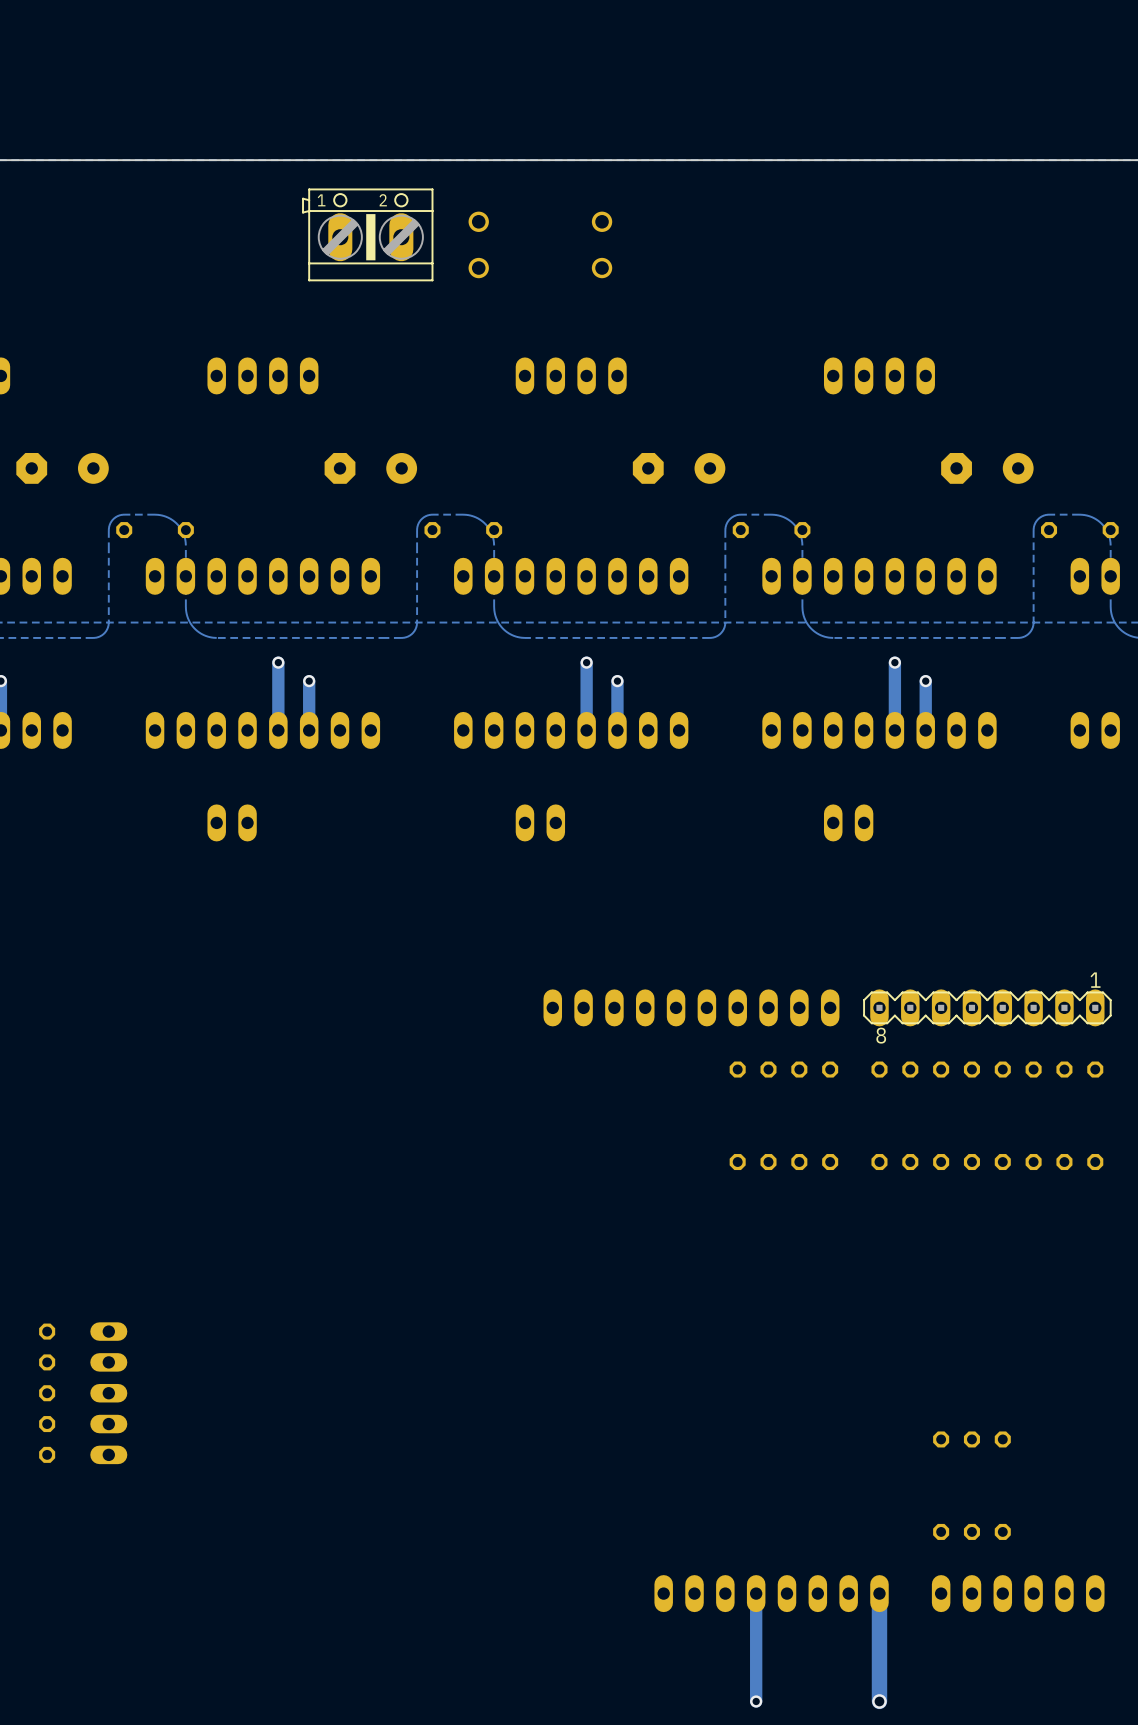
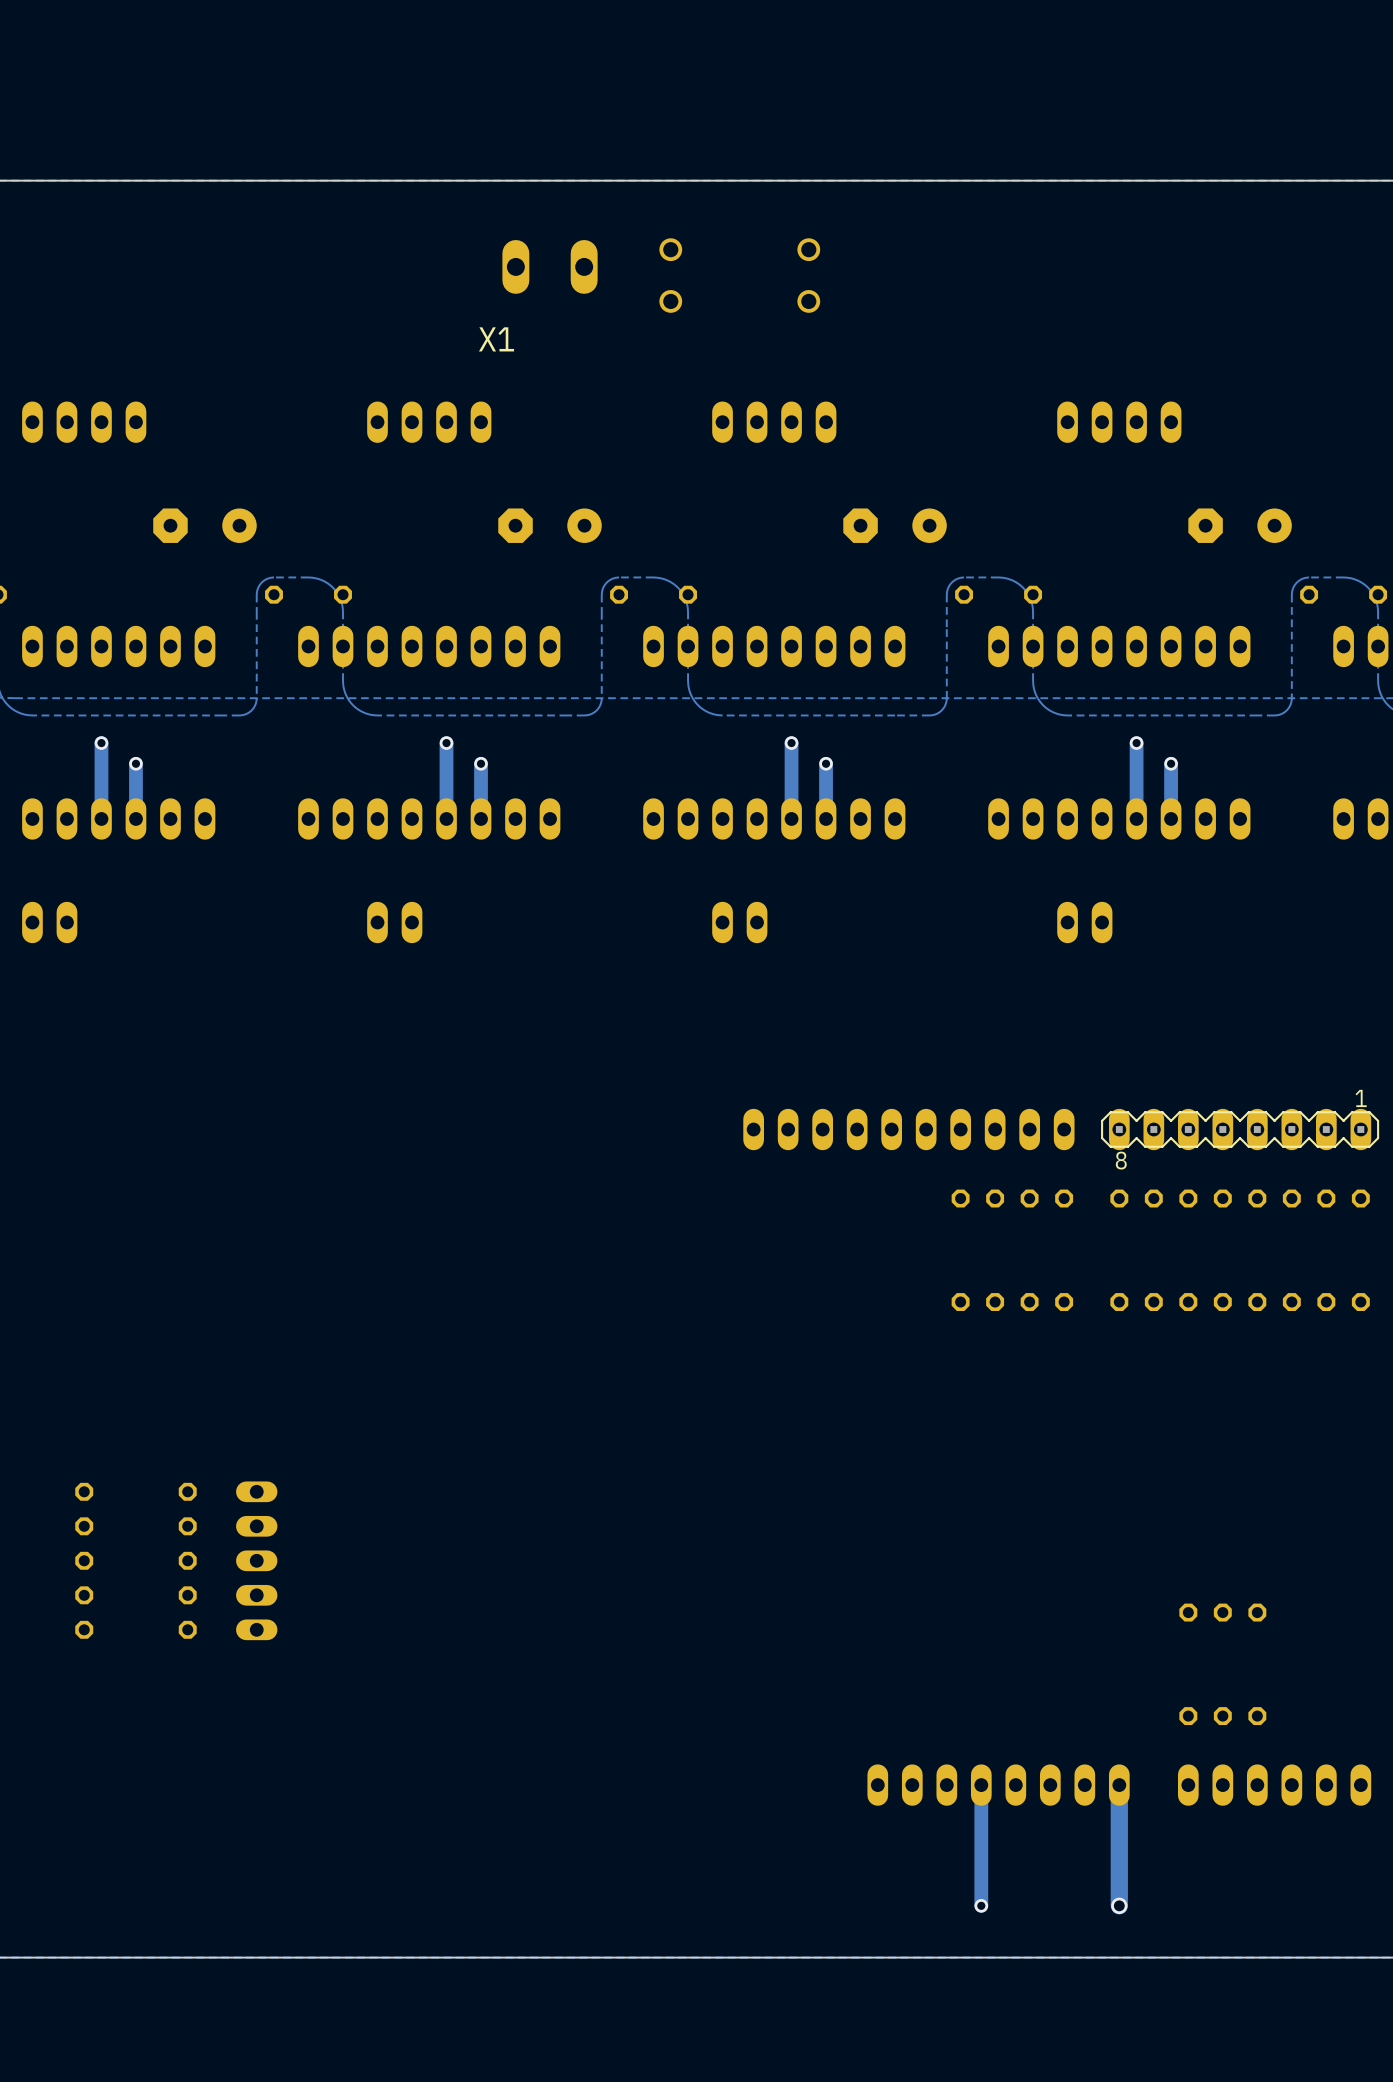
X1 side: bottom (367, 234) -> top (550, 266)

